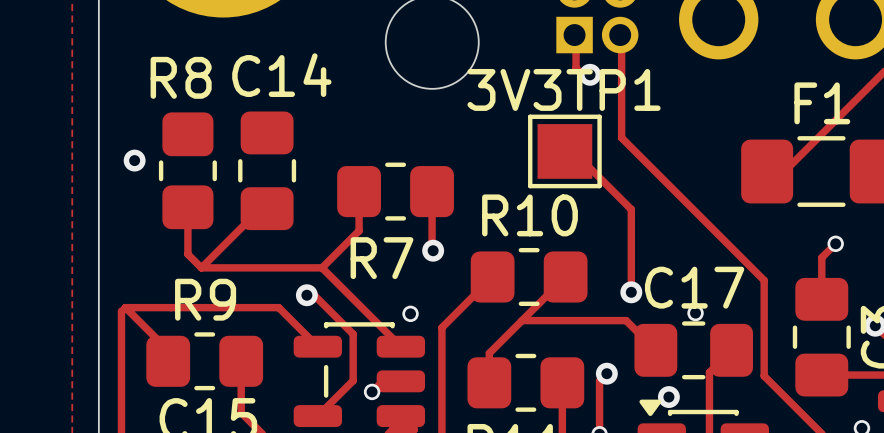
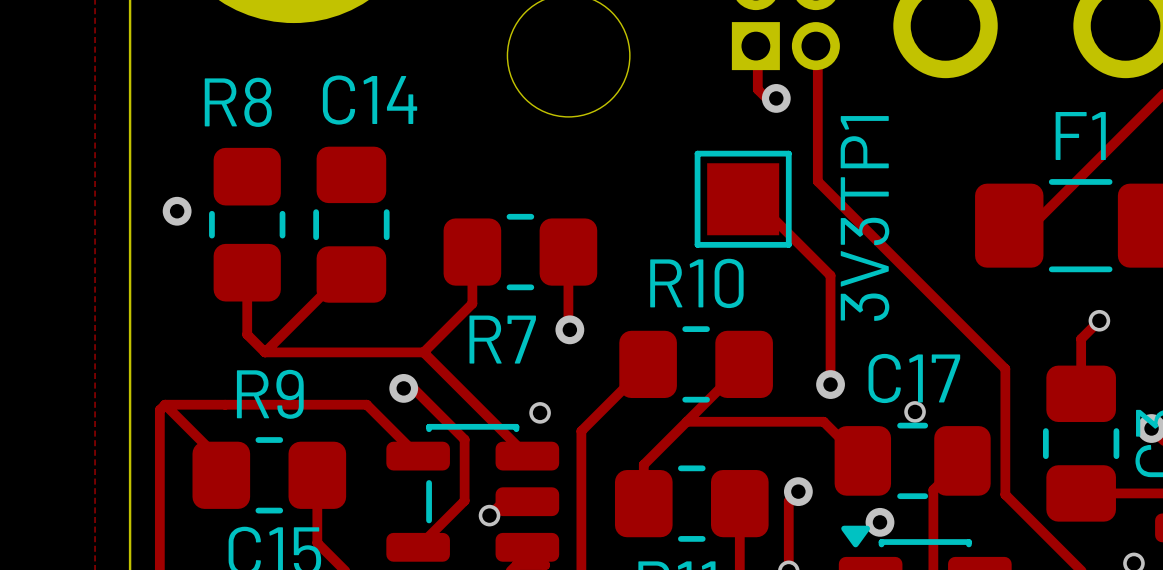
3V3TP1 name rotation: 0° (564, 89) -> 90° counterclockwise (865, 218)

